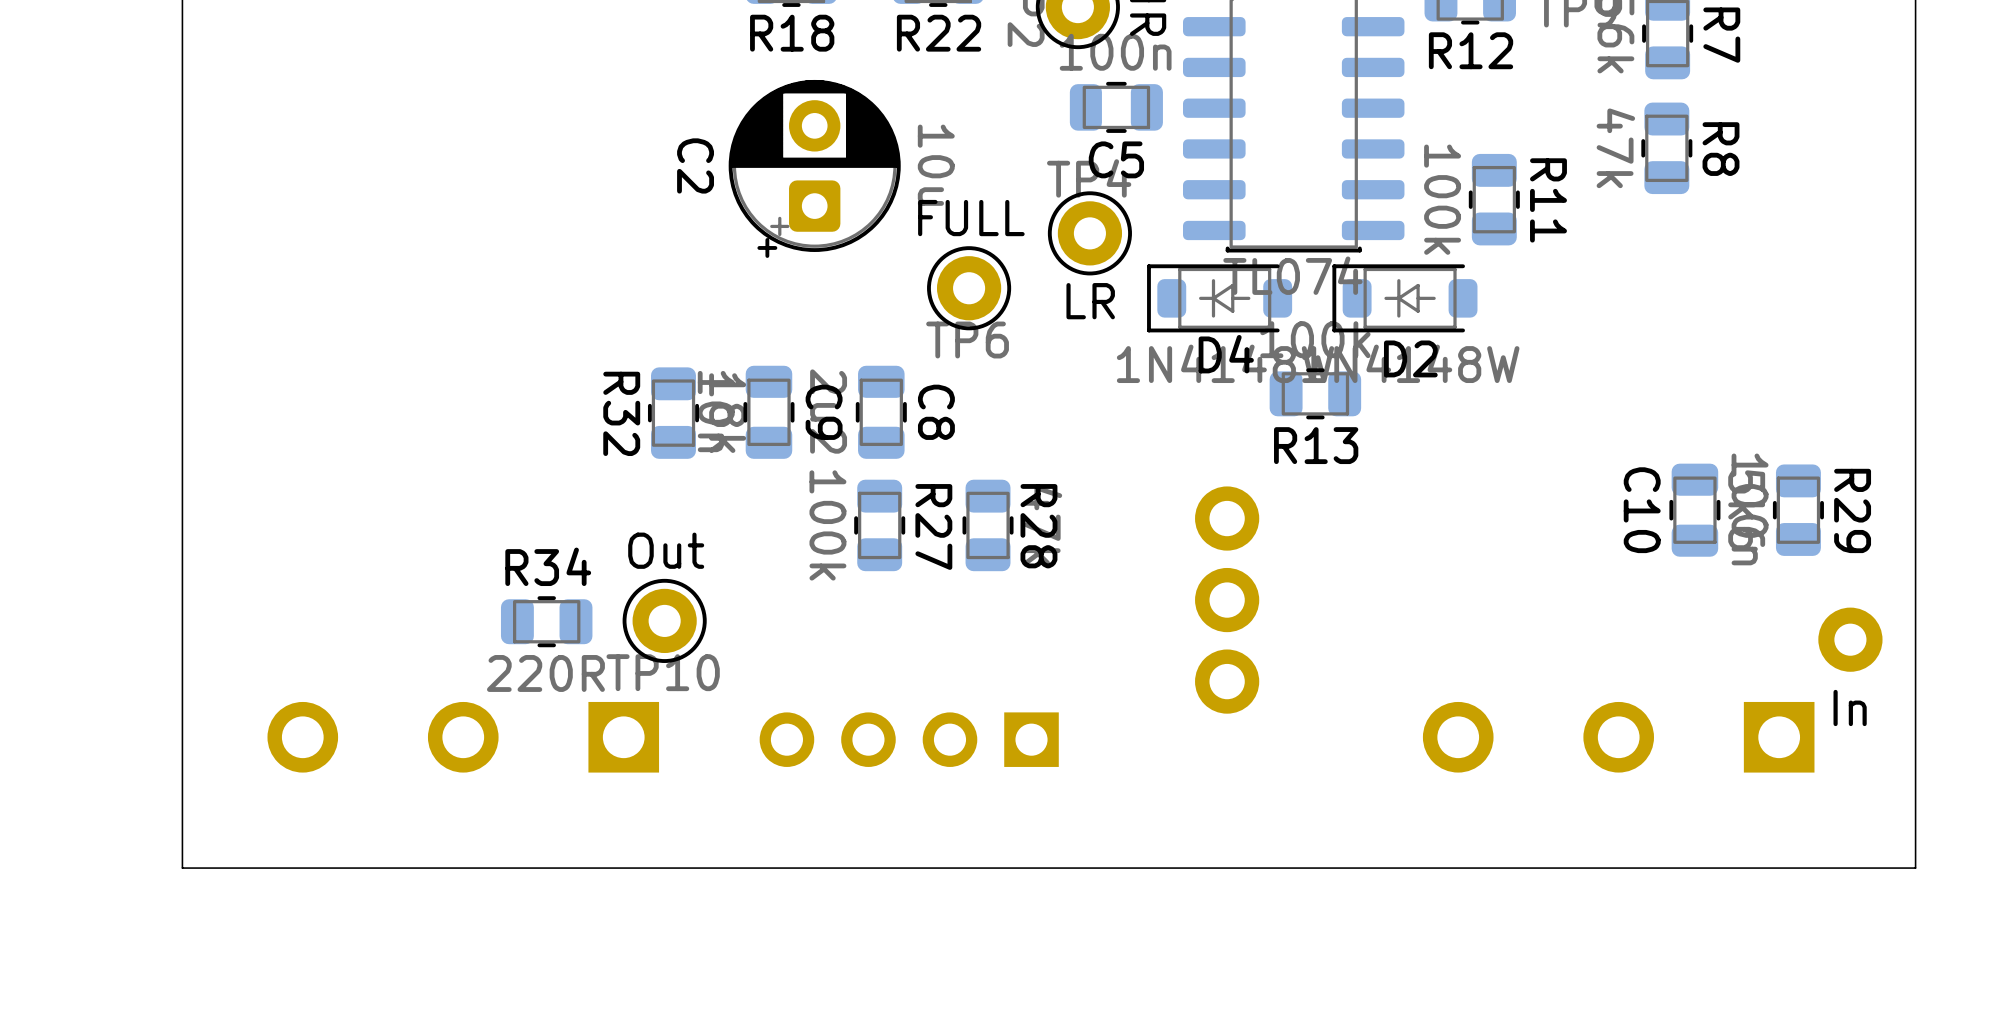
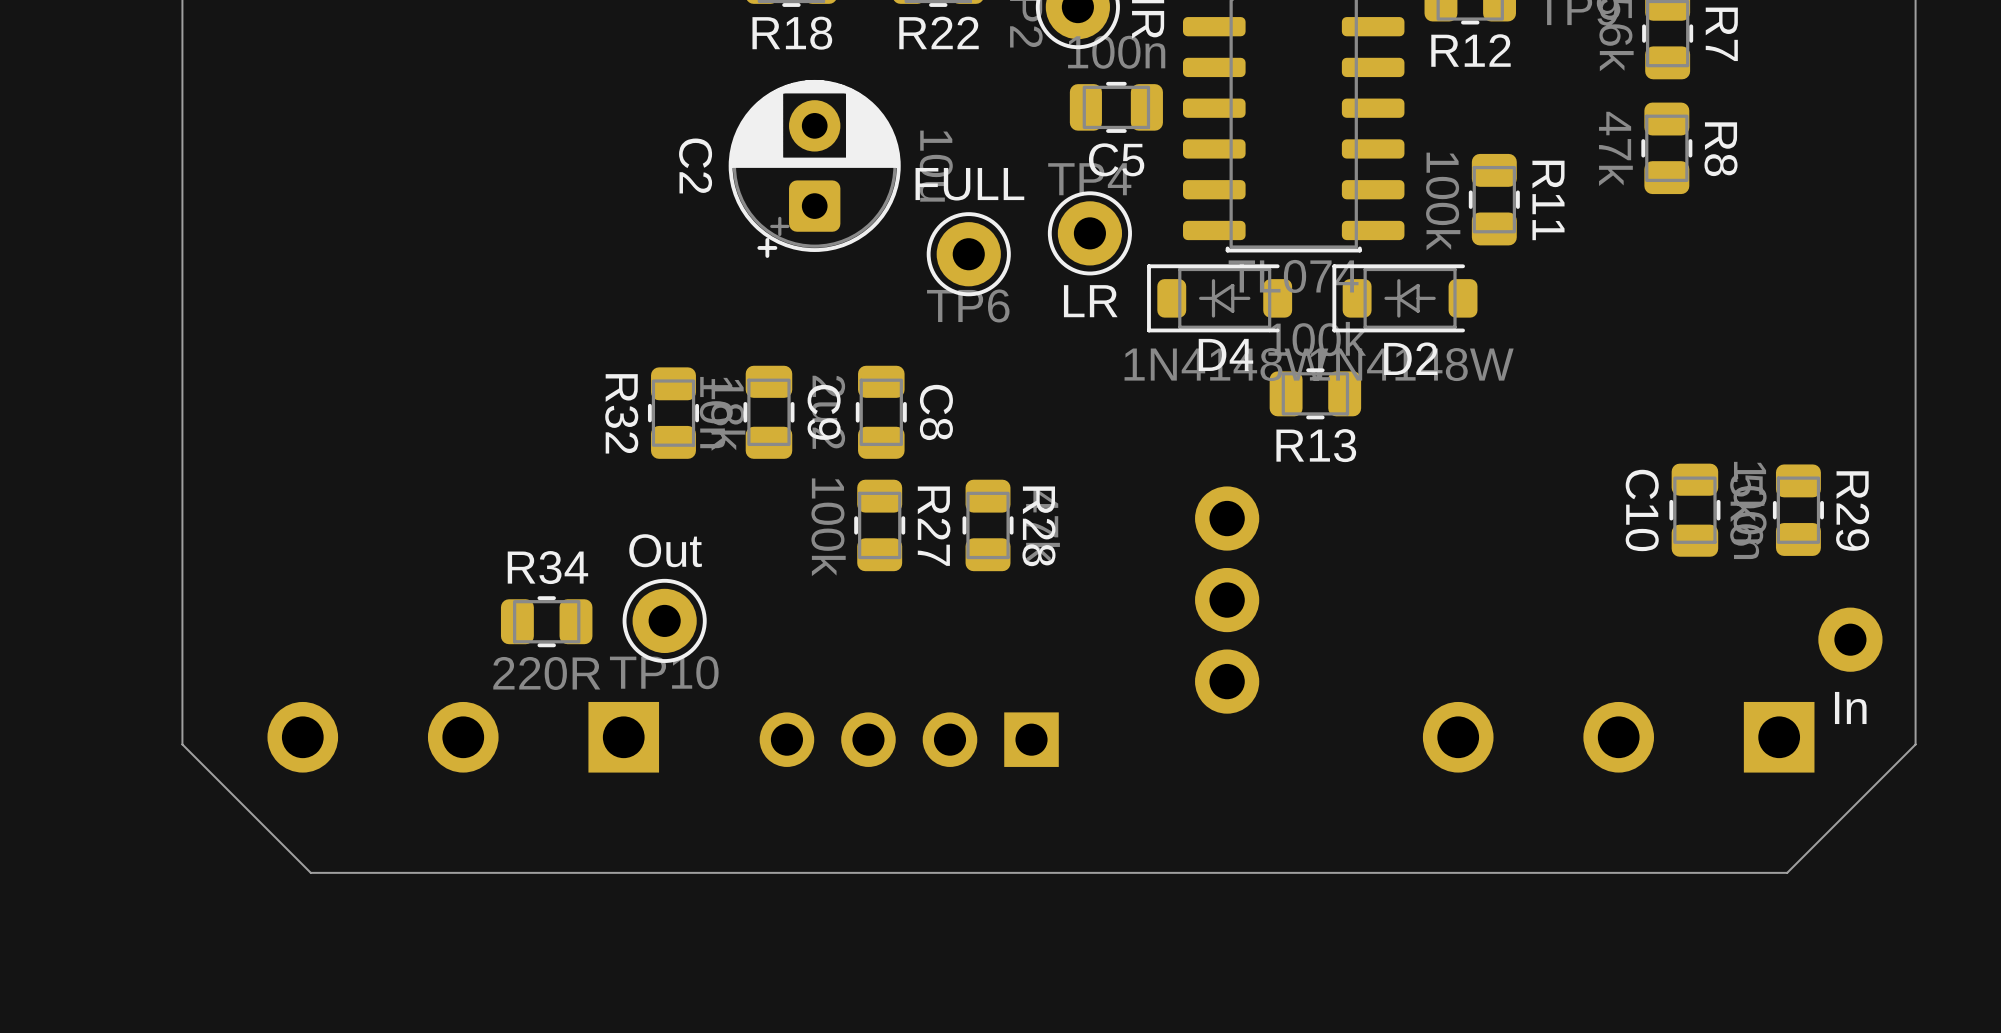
TP6 position: (969, 288) -> (968, 254)
board edge: (1915, 744) (1915, 868) (182, 868) (182, 744) -> (1915, 744) (1787, 872) (310, 872) (182, 744)

